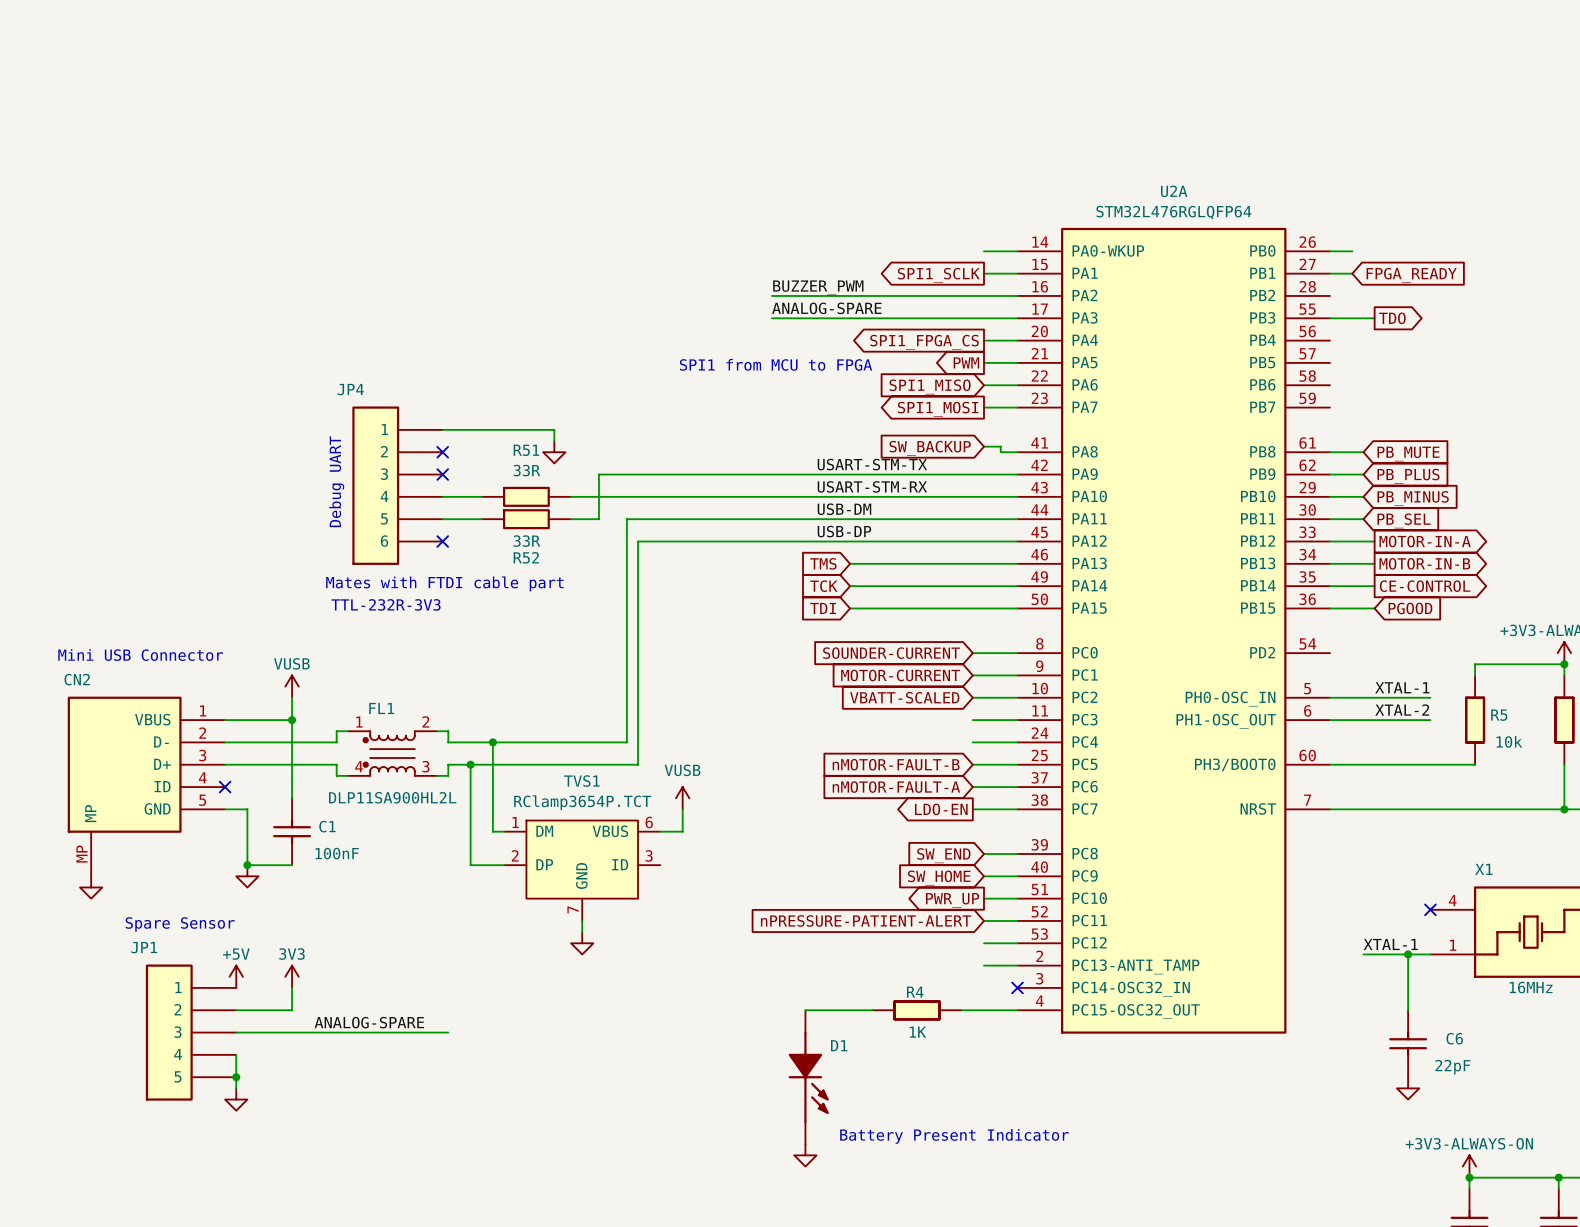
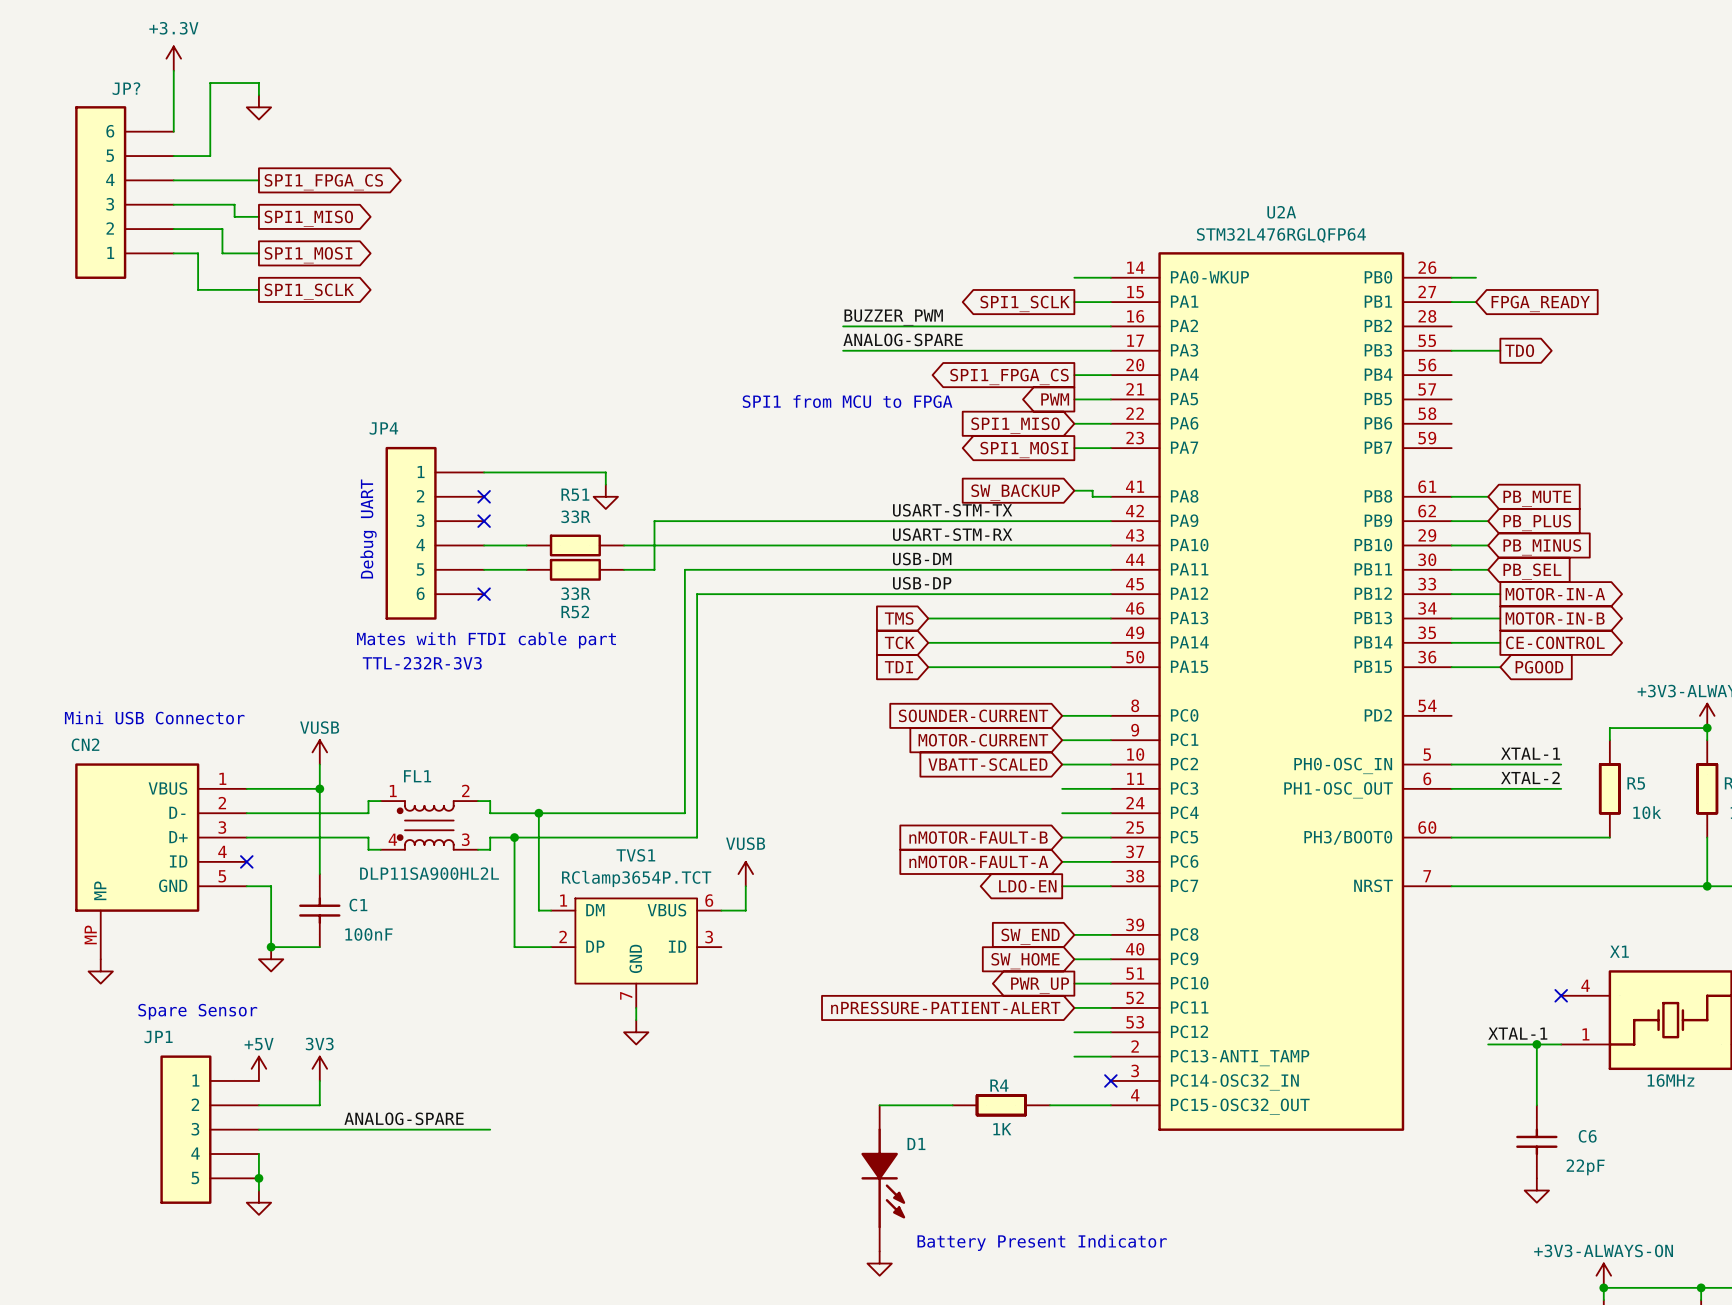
power symbol: none -> +3.3V (173, 58)
wire: none -> (173, 70) (173, 131)
wire: none -> (258, 95) (258, 83) (210, 83) (210, 156) (173, 156)
power symbol: none -> (258, 107)
wire: none -> (173, 180) (258, 180)
global label: none -> SPI1_FPGA_CS (323, 182)
JP?: none -> (124, 192)
wire: none -> (173, 204) (234, 204) (234, 216) (258, 216)
global label: none -> SPI1_MISO (308, 218)
wire: none -> (173, 229) (222, 229) (222, 253) (258, 253)
wire: none -> (173, 253) (198, 253) (198, 289) (258, 289)
global label: none -> SPI1_MOSI (308, 255)
global label: none -> SPI1_SCLK (309, 291)

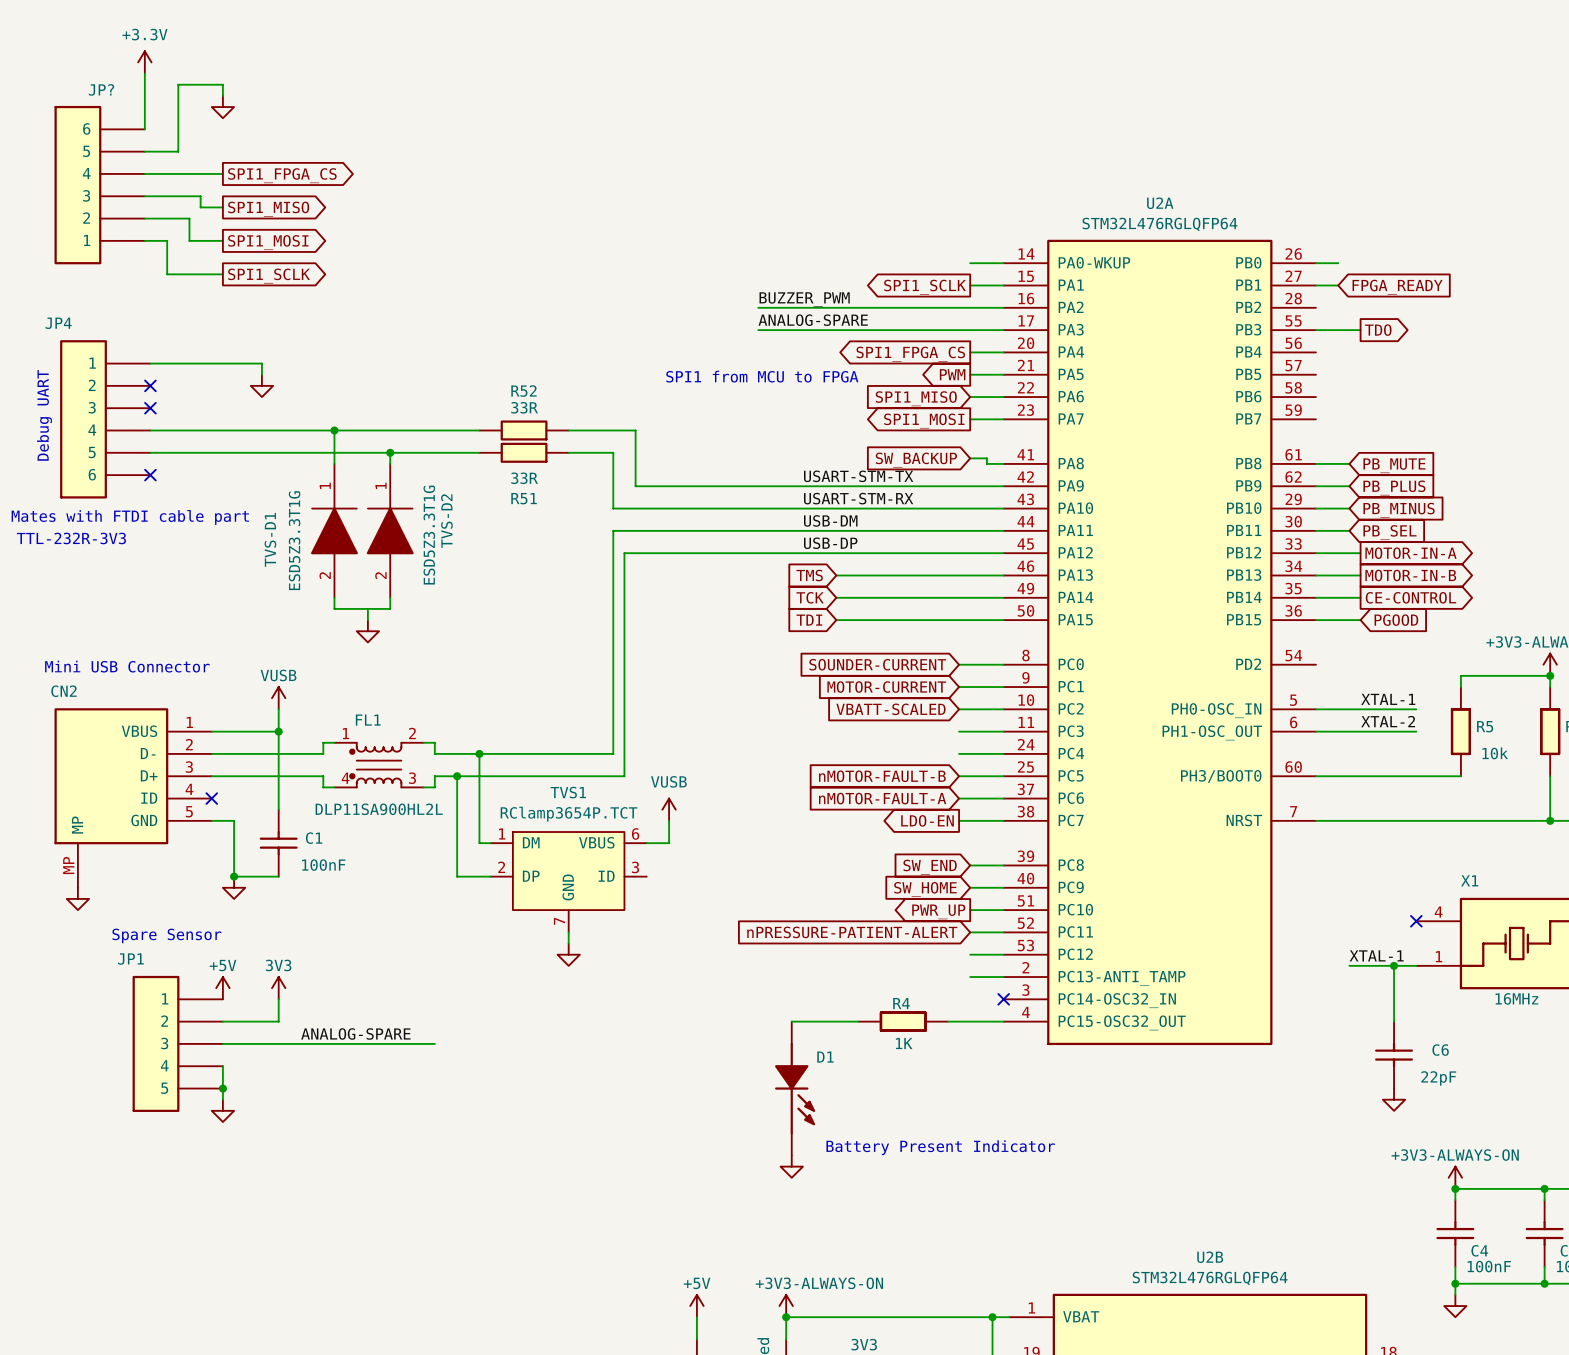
wire: none -> (150, 363) (261, 363) (261, 374)
no-connect mark: none -> (150, 385)
power symbol: none -> (261, 385)
no-connect mark: none -> (150, 408)
text: none -> Debug UART (44, 415)
wire: none -> (150, 430) (479, 430)
wire: none -> (334, 430) (334, 463)
junction: none -> (334, 430)
wire: (484, 472) (605, 472) (605, 484) -> none
wire: none -> (150, 452) (479, 452)
wire: none -> (390, 452) (390, 463)
junction: none -> (390, 452)
no-connect mark: (484, 496) -> none
power symbol: (605, 496) -> none
no-connect mark: none -> (150, 475)
no-connect mark: (484, 521) -> none
wire: (709, 521) (654, 521) (654, 569) (624, 569) -> (635, 486) (635, 430) (568, 430)
text: Debug UART (368, 528) -> none
JP4 position: (434, 533) -> (105, 419)
wire: (484, 545) (526, 545) -> none
R51 rotation: 0° (575, 545) -> 180° (524, 452)
R51 position: (575, 545) -> (524, 452)
wire: (624, 545) (684, 545) -> (568, 452) (613, 452) (613, 508)
text: none -> Mates with FTDI cable part (130, 517)
TVS-D1: none -> ESD5Z3.3T1G (334, 530)
TVS-D2: none -> ESD5Z3.3T1G (390, 530)
wire: (484, 569) (526, 569) -> none
R52 rotation: 0° (575, 569) -> 180° (524, 430)
R52 position: (575, 569) -> (524, 430)
text: none -> TTL-232R-3V3 (71, 538)
no-connect mark: (484, 594) -> none
text: Mates with FTDI cable part (486, 640) -> none
wire: none -> (334, 597) (334, 608) (390, 608) (390, 597)
wire: none -> (367, 608) (367, 620)
text: TTL-232R-3V3 (422, 663) -> none
power symbol: none -> (367, 631)

